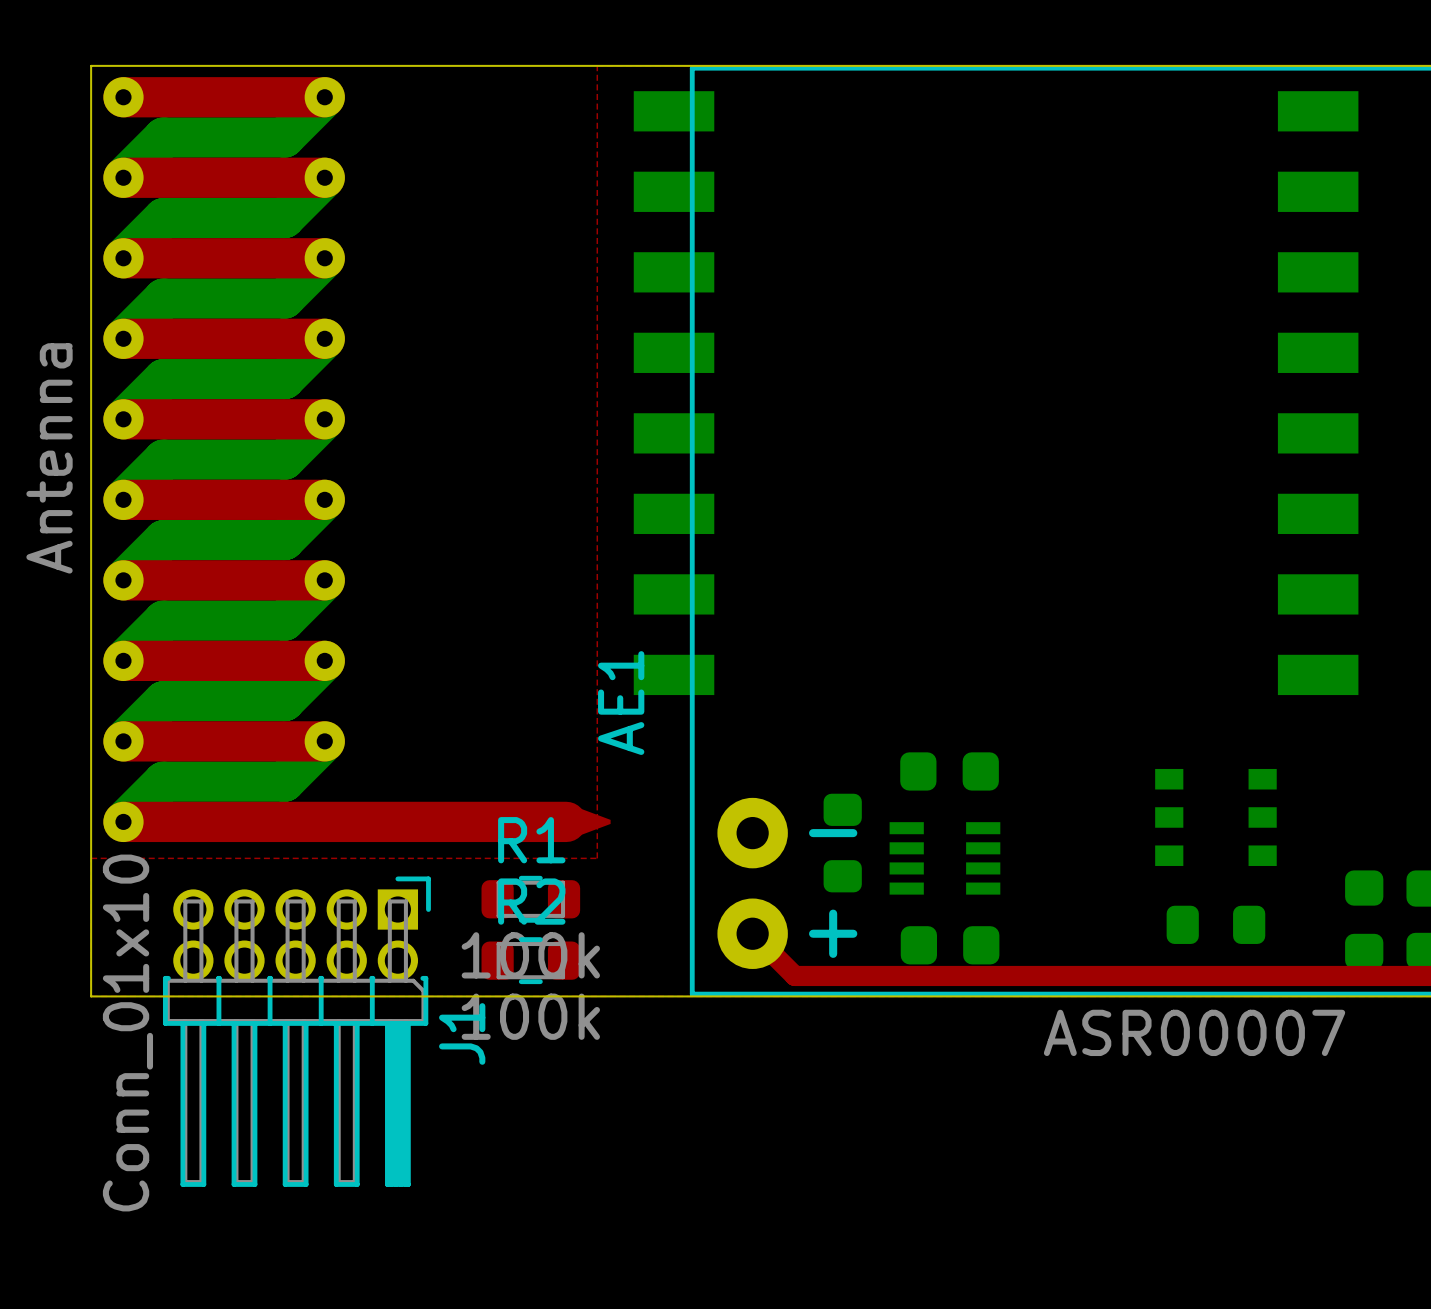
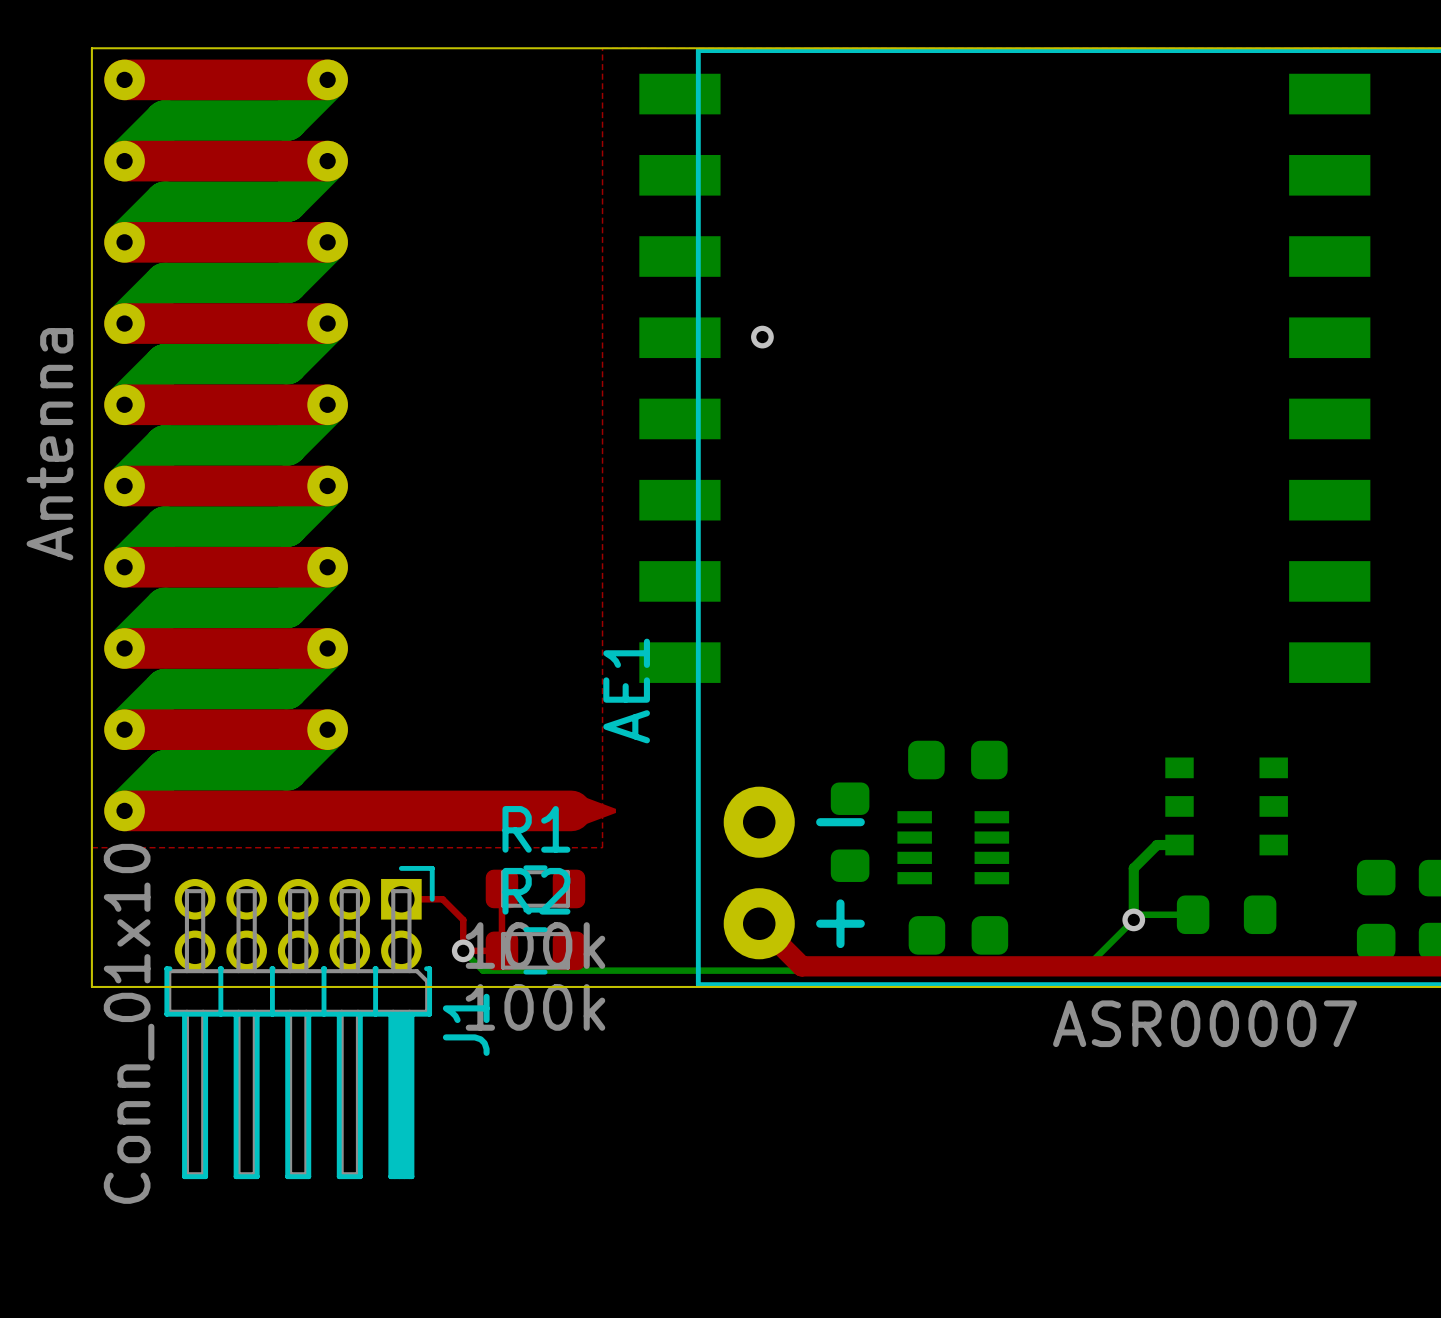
via: none -> (762, 337)
bottom track: none -> (1179, 845) (1157, 845) (1133, 868) (1133, 919)
top track: none -> (501, 888) (501, 950) (463, 950) (463, 919) (442, 899) (401, 899)
bottom track: none -> (1193, 914) (1138, 914) (1083, 970) (483, 970) (463, 950)
via: none -> (1133, 919)
via: none -> (463, 950)

